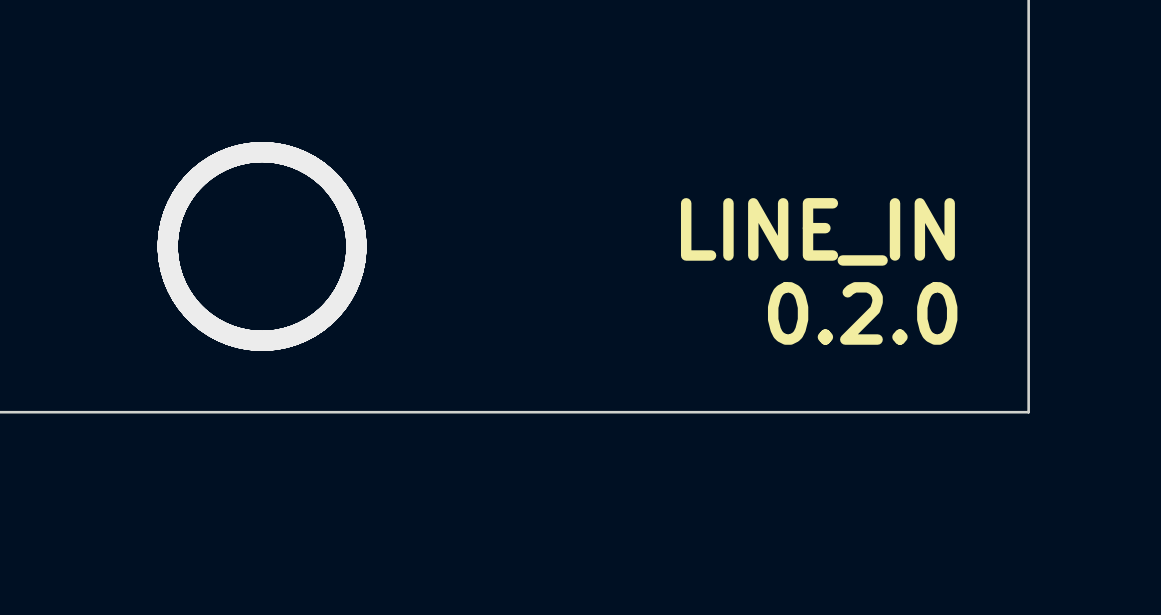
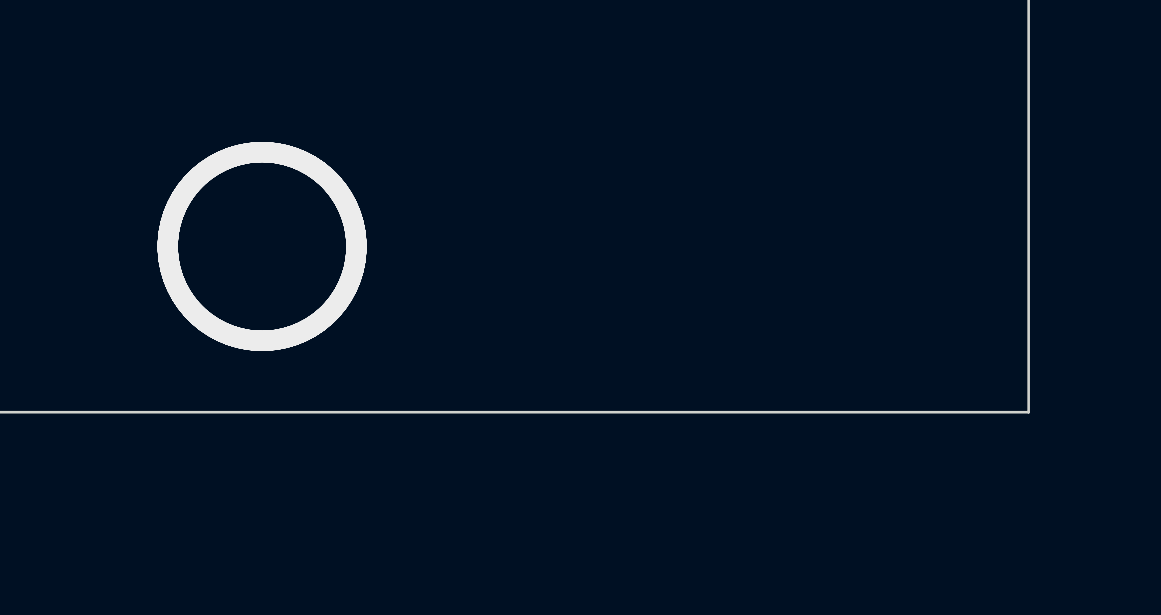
text: LINE_IN (817, 231) -> none
text: 0.2.0 (862, 313) -> none

